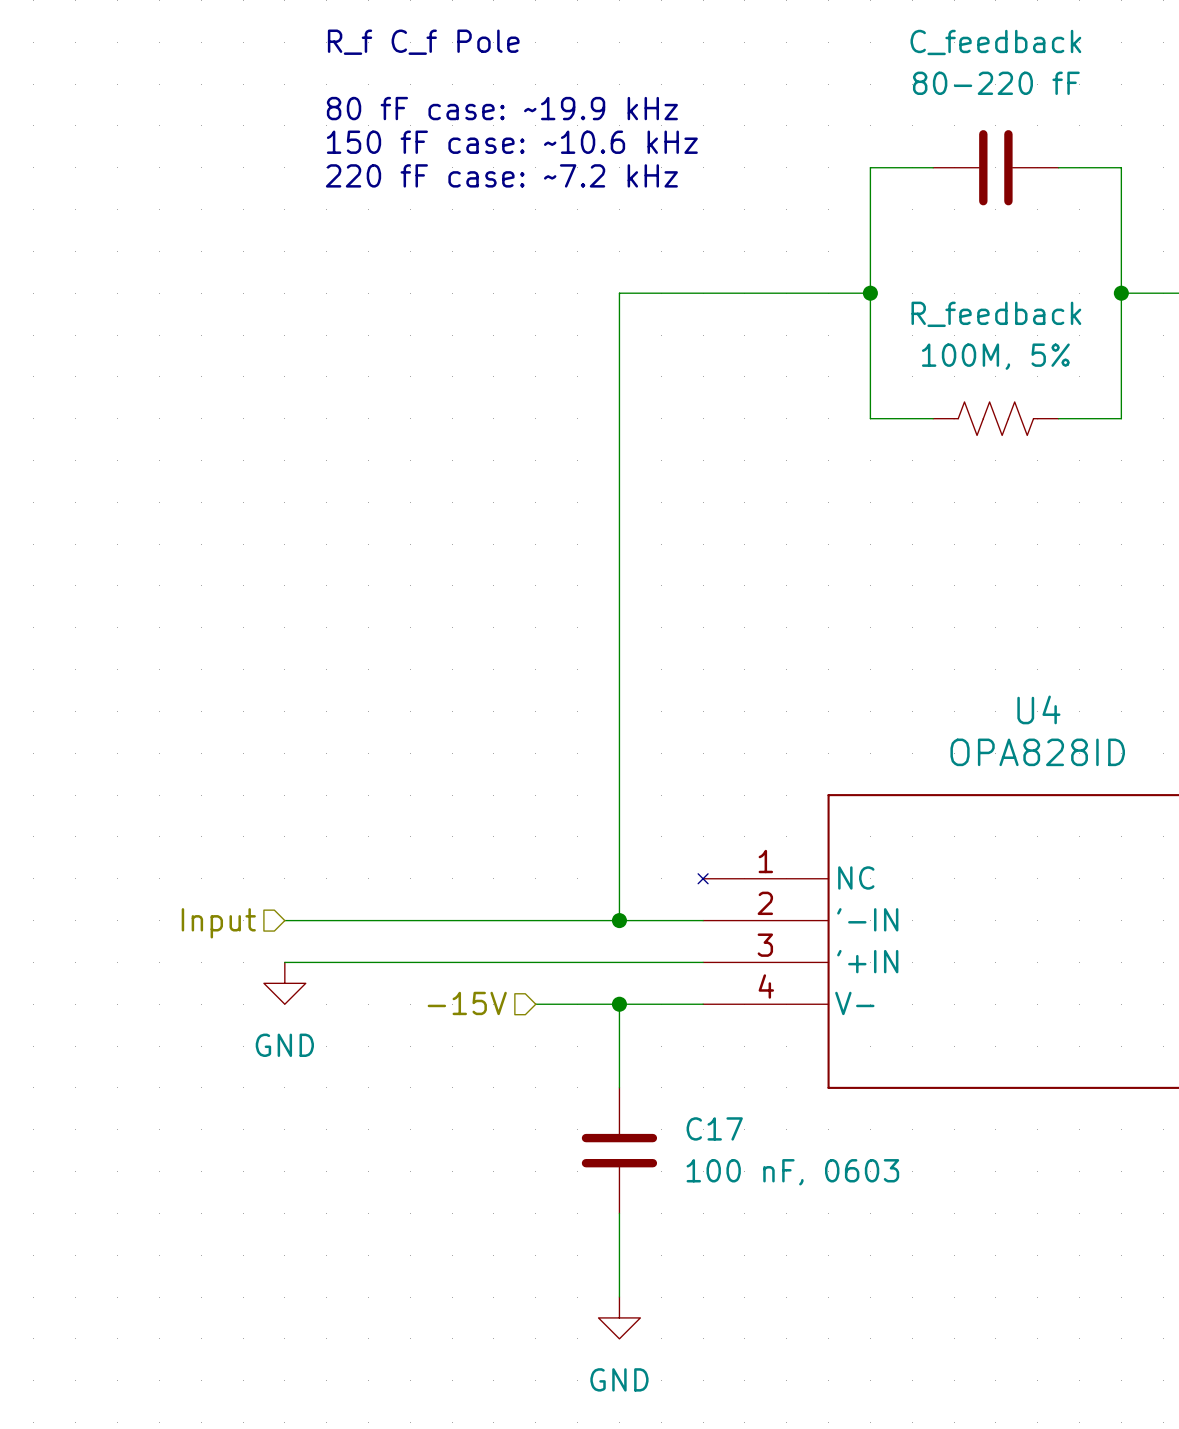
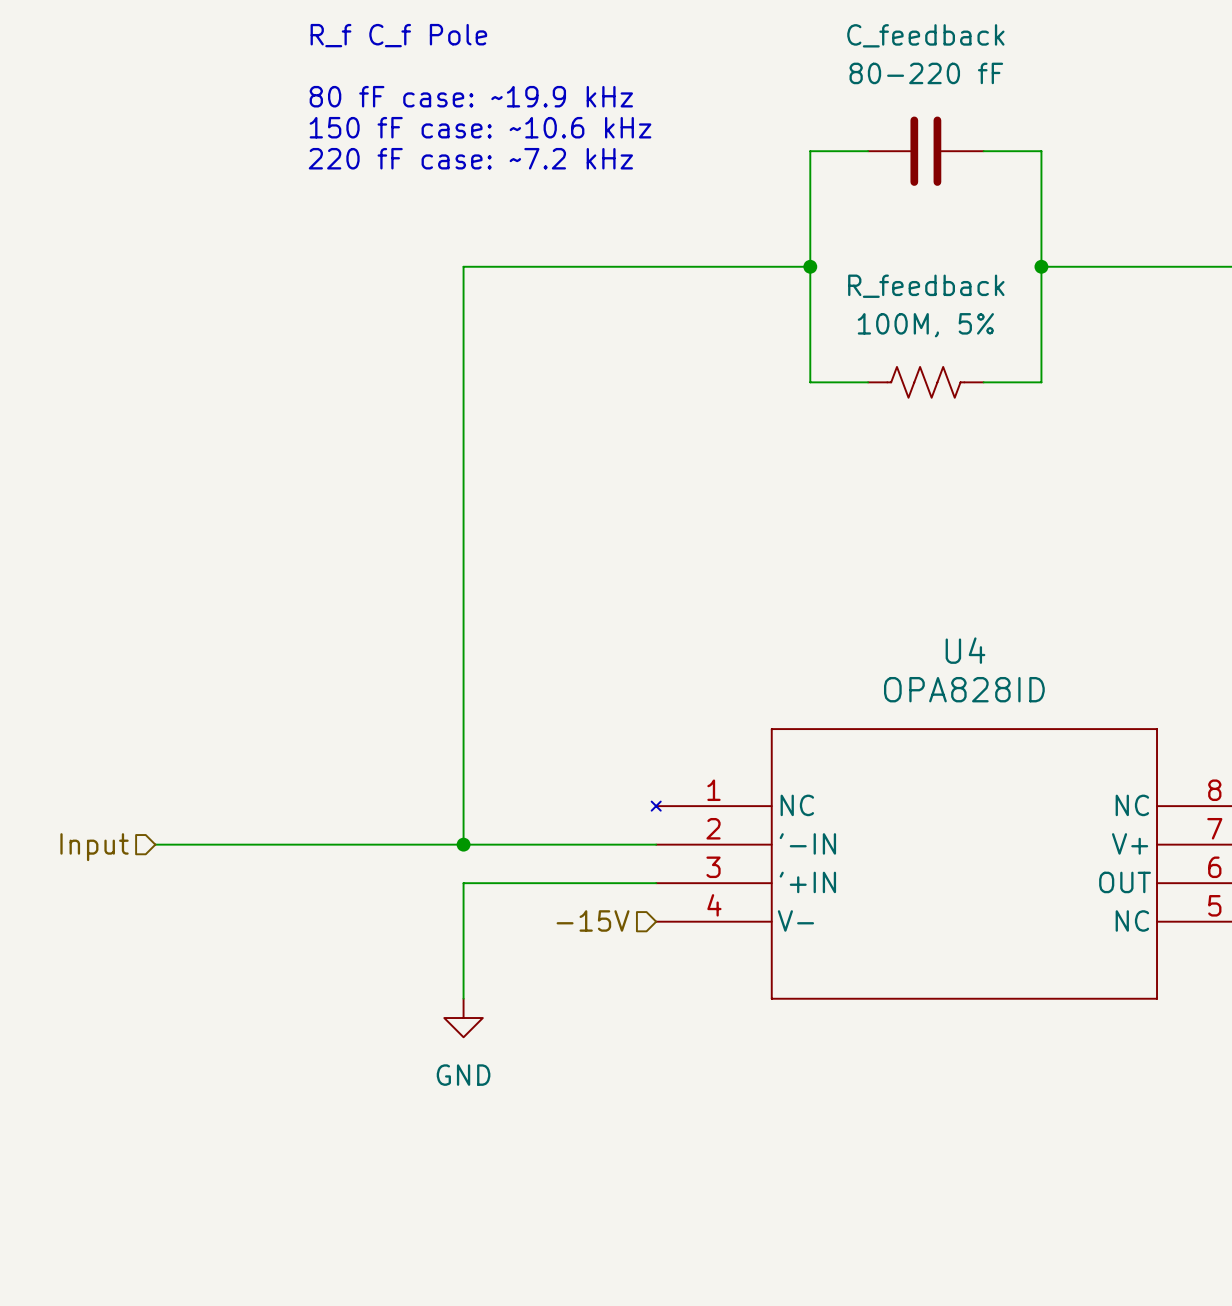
wire: (619, 293) (619, 920) -> (579, 266) (463, 266) (463, 844)
wire: none -> (155, 844) (270, 844)
junction: none -> (463, 844)
junction: (619, 920) -> none
hierarchical label position: Input (218, 923) -> Input (94, 847)
wire: (284, 962) (493, 962) -> (463, 998) (463, 883)
power symbol: GND (284, 983) -> none
hierarchical label position: -15V (467, 1003) -> -15V (593, 920)
wire: (535, 1004) (703, 1004) -> none
wire: (619, 1004) (619, 1087) -> none
junction: (619, 1004) -> none
power symbol: none -> GND (463, 1018)
C17: 100 nF, 0603 (619, 1150) -> none
wire: (619, 1213) (619, 1297) -> none
power symbol: GND (619, 1317) -> none

